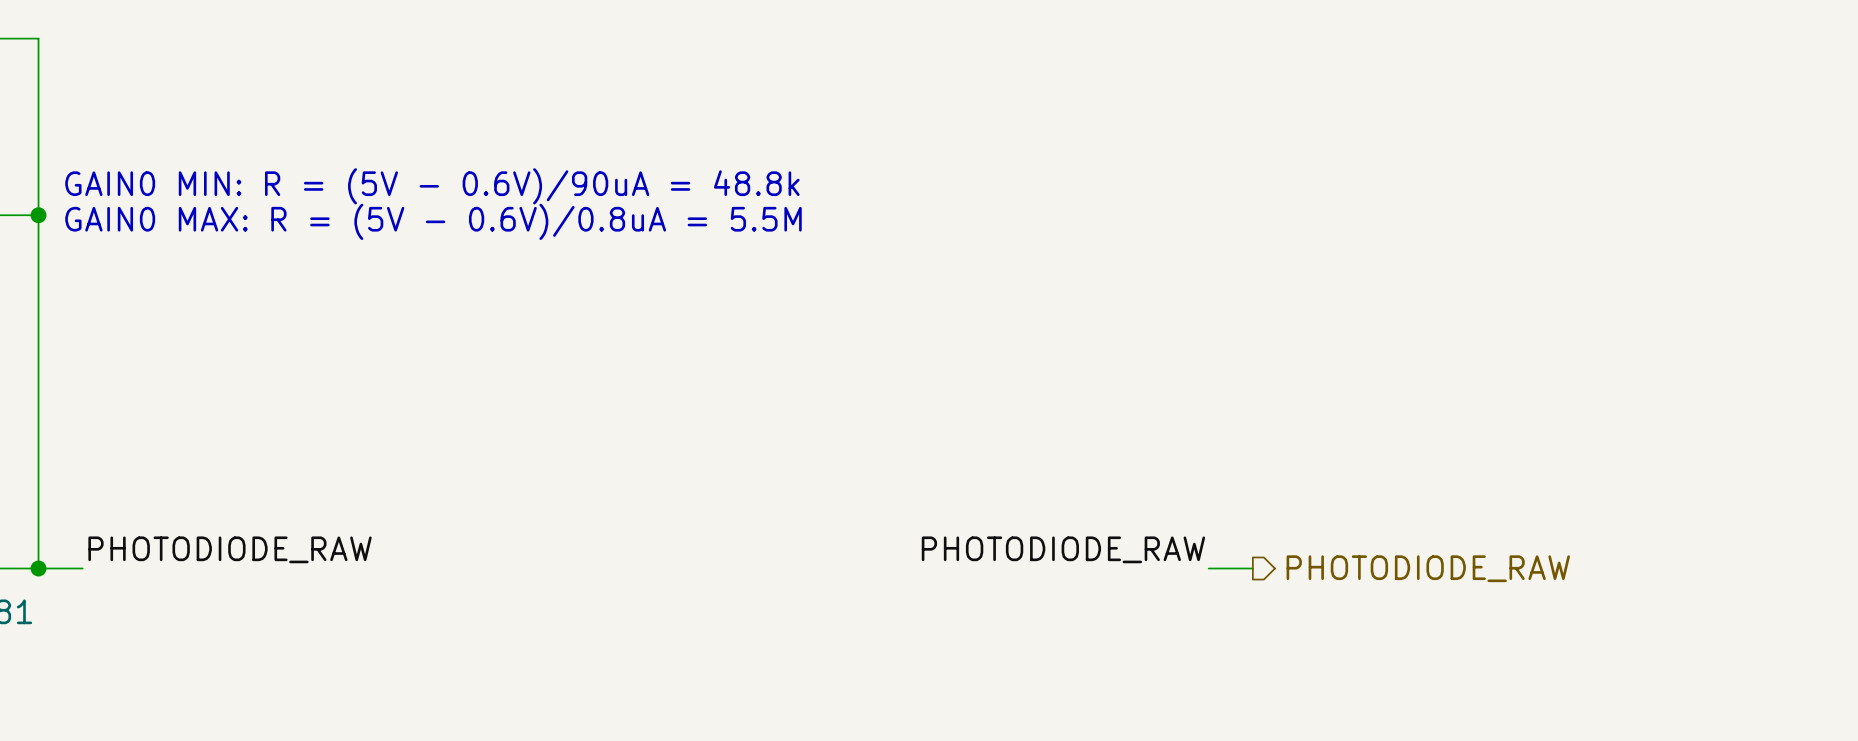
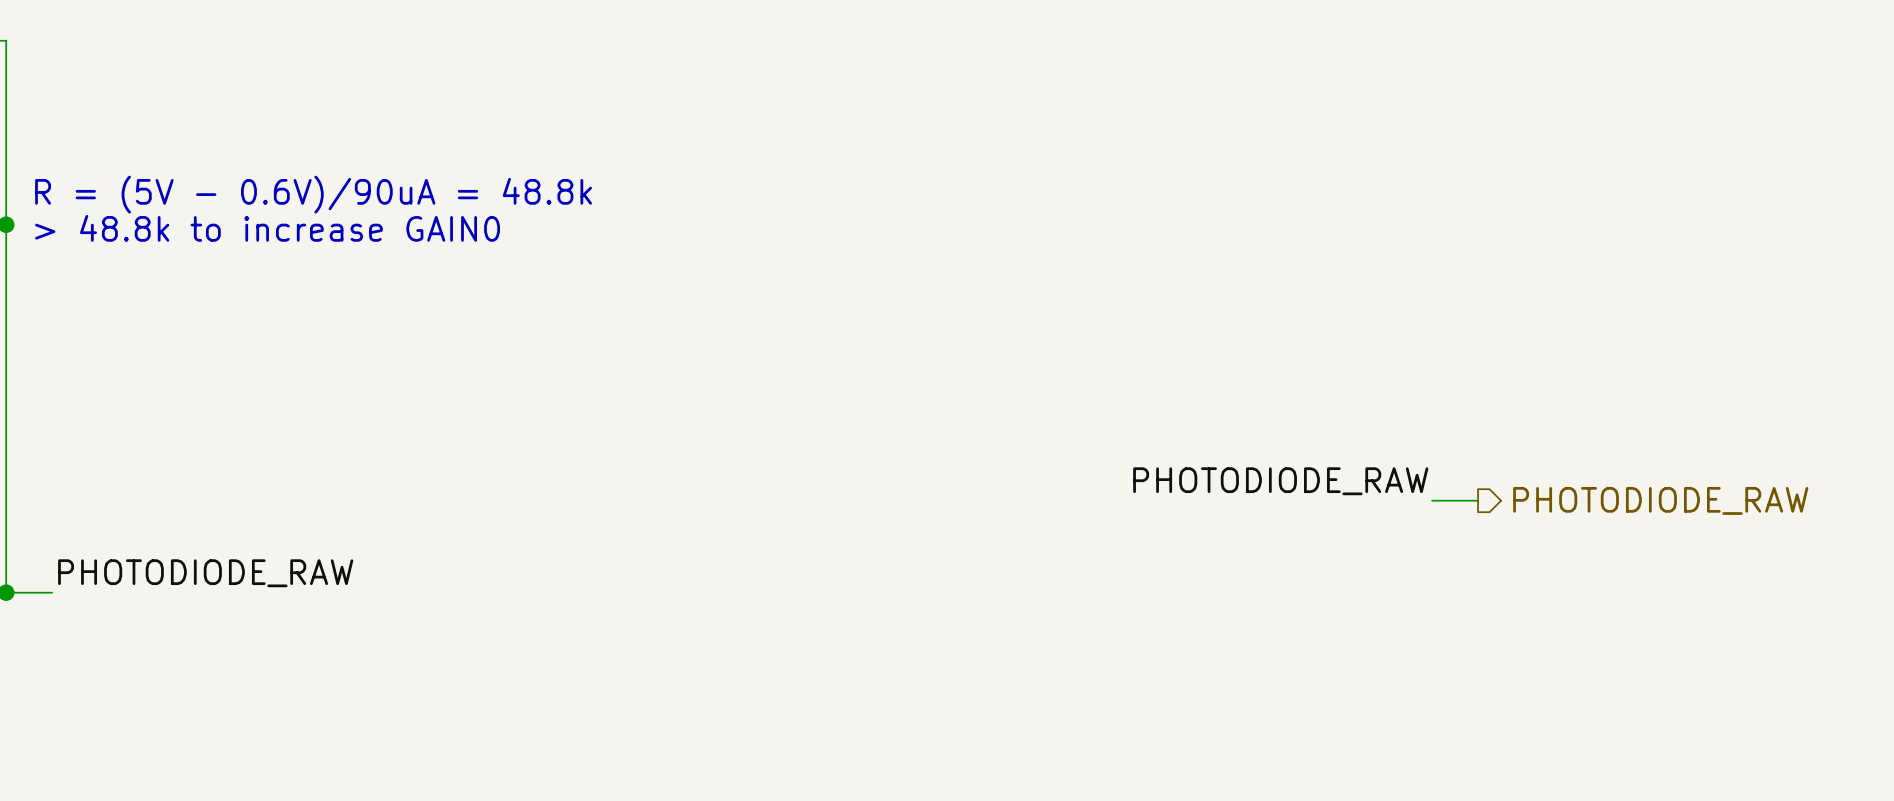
text: GAIN0 MIN: R = (5V - 0.6V)/90uA = 48.8k (432, 186) -> R = (5V - 0.6V)/90uA = 48.8k (313, 194)
text: GAIN0 MAX: R = (5V - 0.6V)/0.8uA = 5.5M (433, 221) -> > 48.8k to increase GAIN0 (267, 228)
label position: PHOTODIODE_RAW (1063, 549) -> PHOTODIODE_RAW (1280, 481)
wire: (1208, 568) (1252, 568) -> (1432, 500) (1478, 500)
hierarchical label position: PHOTODIODE_RAW (1428, 568) -> PHOTODIODE_RAW (1660, 500)

